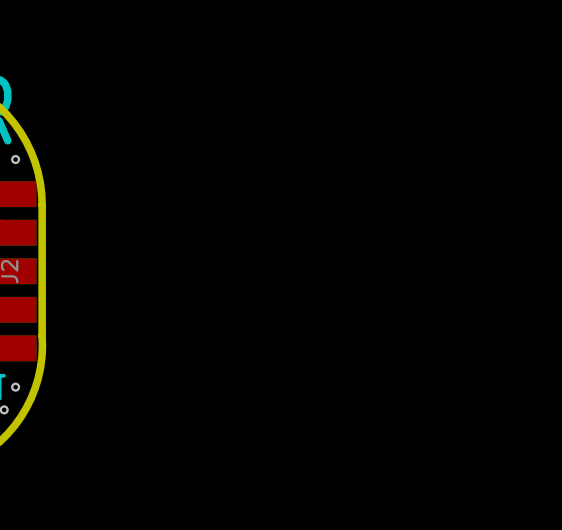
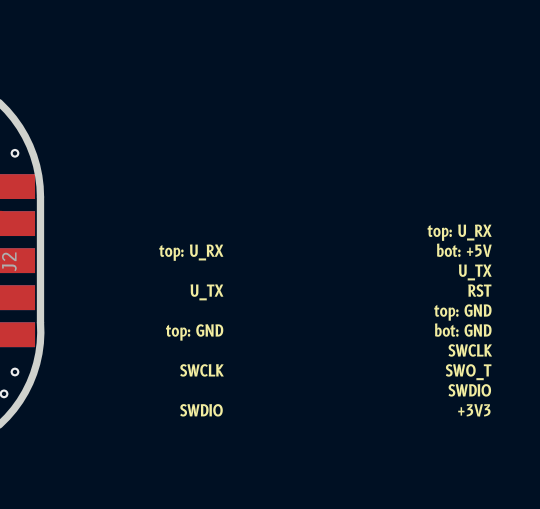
text: none -> top: U_RX (459, 232)
text: none -> bot: +5V (464, 250)
text: none -> top: U_RX (191, 252)
text: none -> U_TX (475, 272)
text: none -> U_TX (206, 292)
text: none -> RST (479, 290)
text: none -> top: GND (462, 312)
text: none -> bot: GND (463, 330)
text: none -> top: GND (194, 332)
text: none -> SWCLK (470, 350)
text: none -> SWCLK (202, 370)
text: none -> SWO_T (468, 372)
text: none -> SWDIO (469, 390)
text: none -> SWDIO (201, 410)
text: none -> +3V3 (474, 410)

